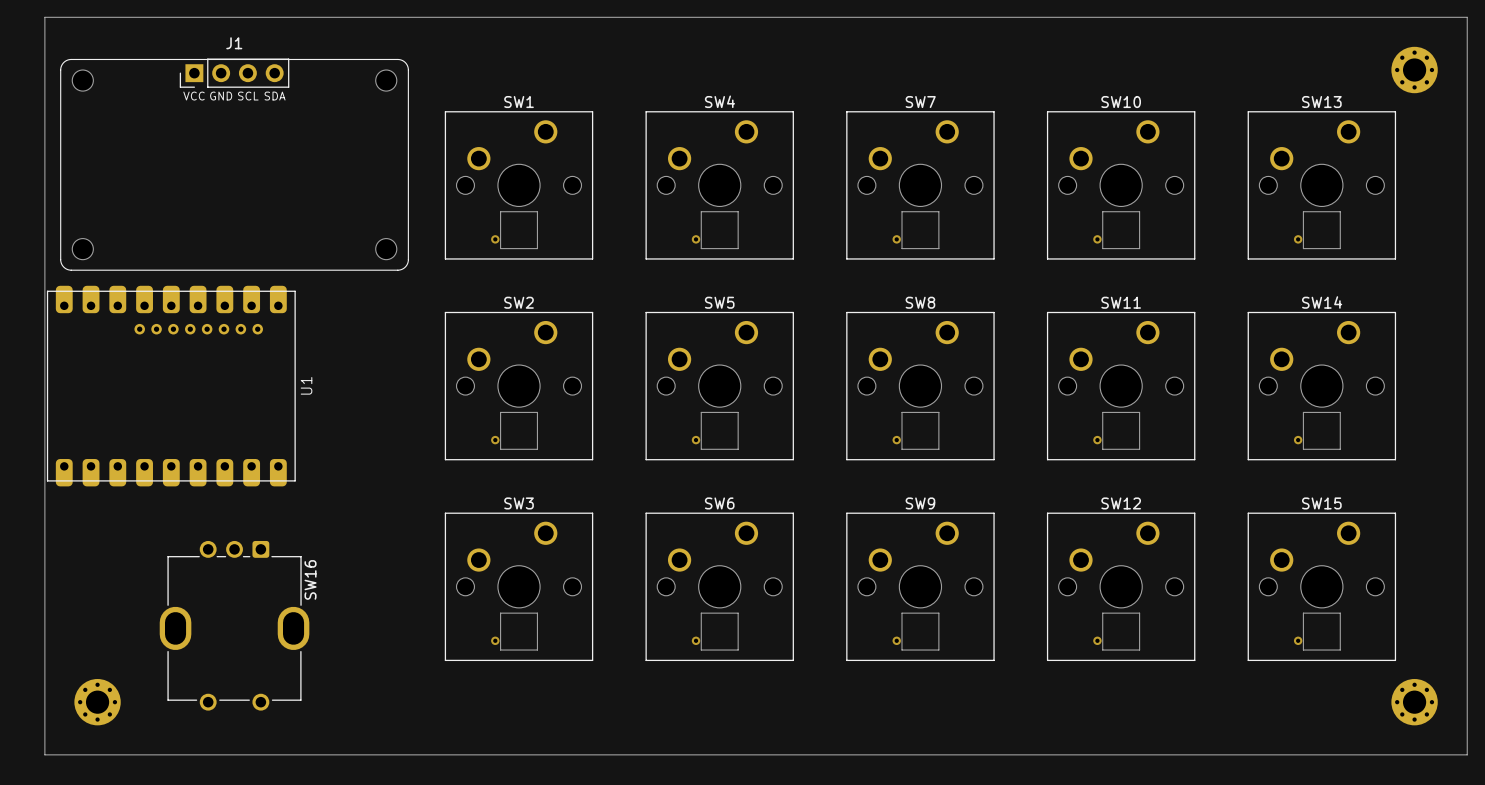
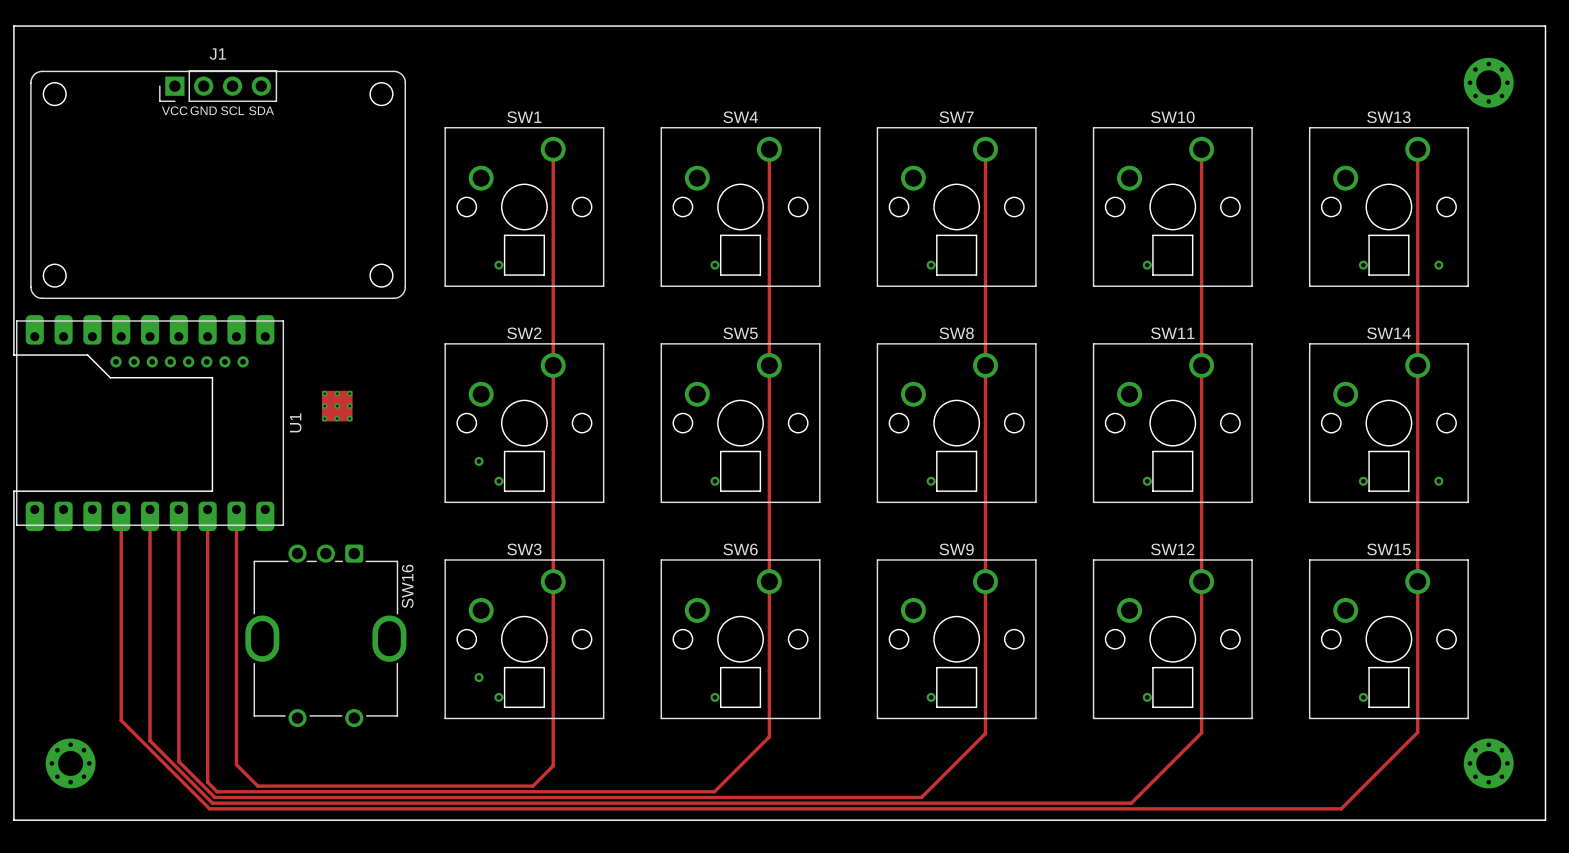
track: none -> (553, 149) (553, 765) (532, 786) (257, 786) (236, 764) (236, 509)
track: none -> (769, 149) (769, 736) (714, 791) (217, 791) (207, 782) (207, 509)
track: none -> (985, 149) (985, 733) (921, 797) (214, 797) (178, 761) (178, 509) (176, 511)
track: none -> (1201, 149) (1201, 732) (1131, 803) (212, 803) (150, 740) (150, 509)
track: none -> (1417, 149) (1417, 732) (1341, 808) (209, 808) (121, 720) (121, 509)
via: none -> (1438, 265)
board edge: (44, 322) (44, 449) -> (13, 355) (87, 355) (110, 377) (212, 377) (212, 491) (13, 491)
part: none -> (337, 406)
via: none -> (479, 461)
via: none -> (1438, 481)
via: none -> (479, 677)
SW16 position: (234, 625) -> (325, 635)

